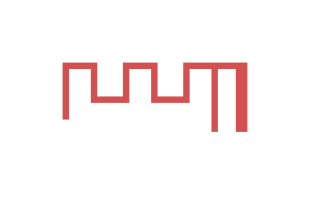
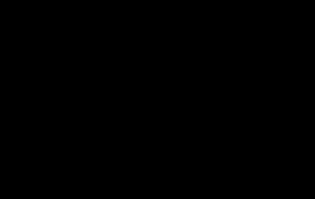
drawing: [62, 62, 248, 132] -> none

